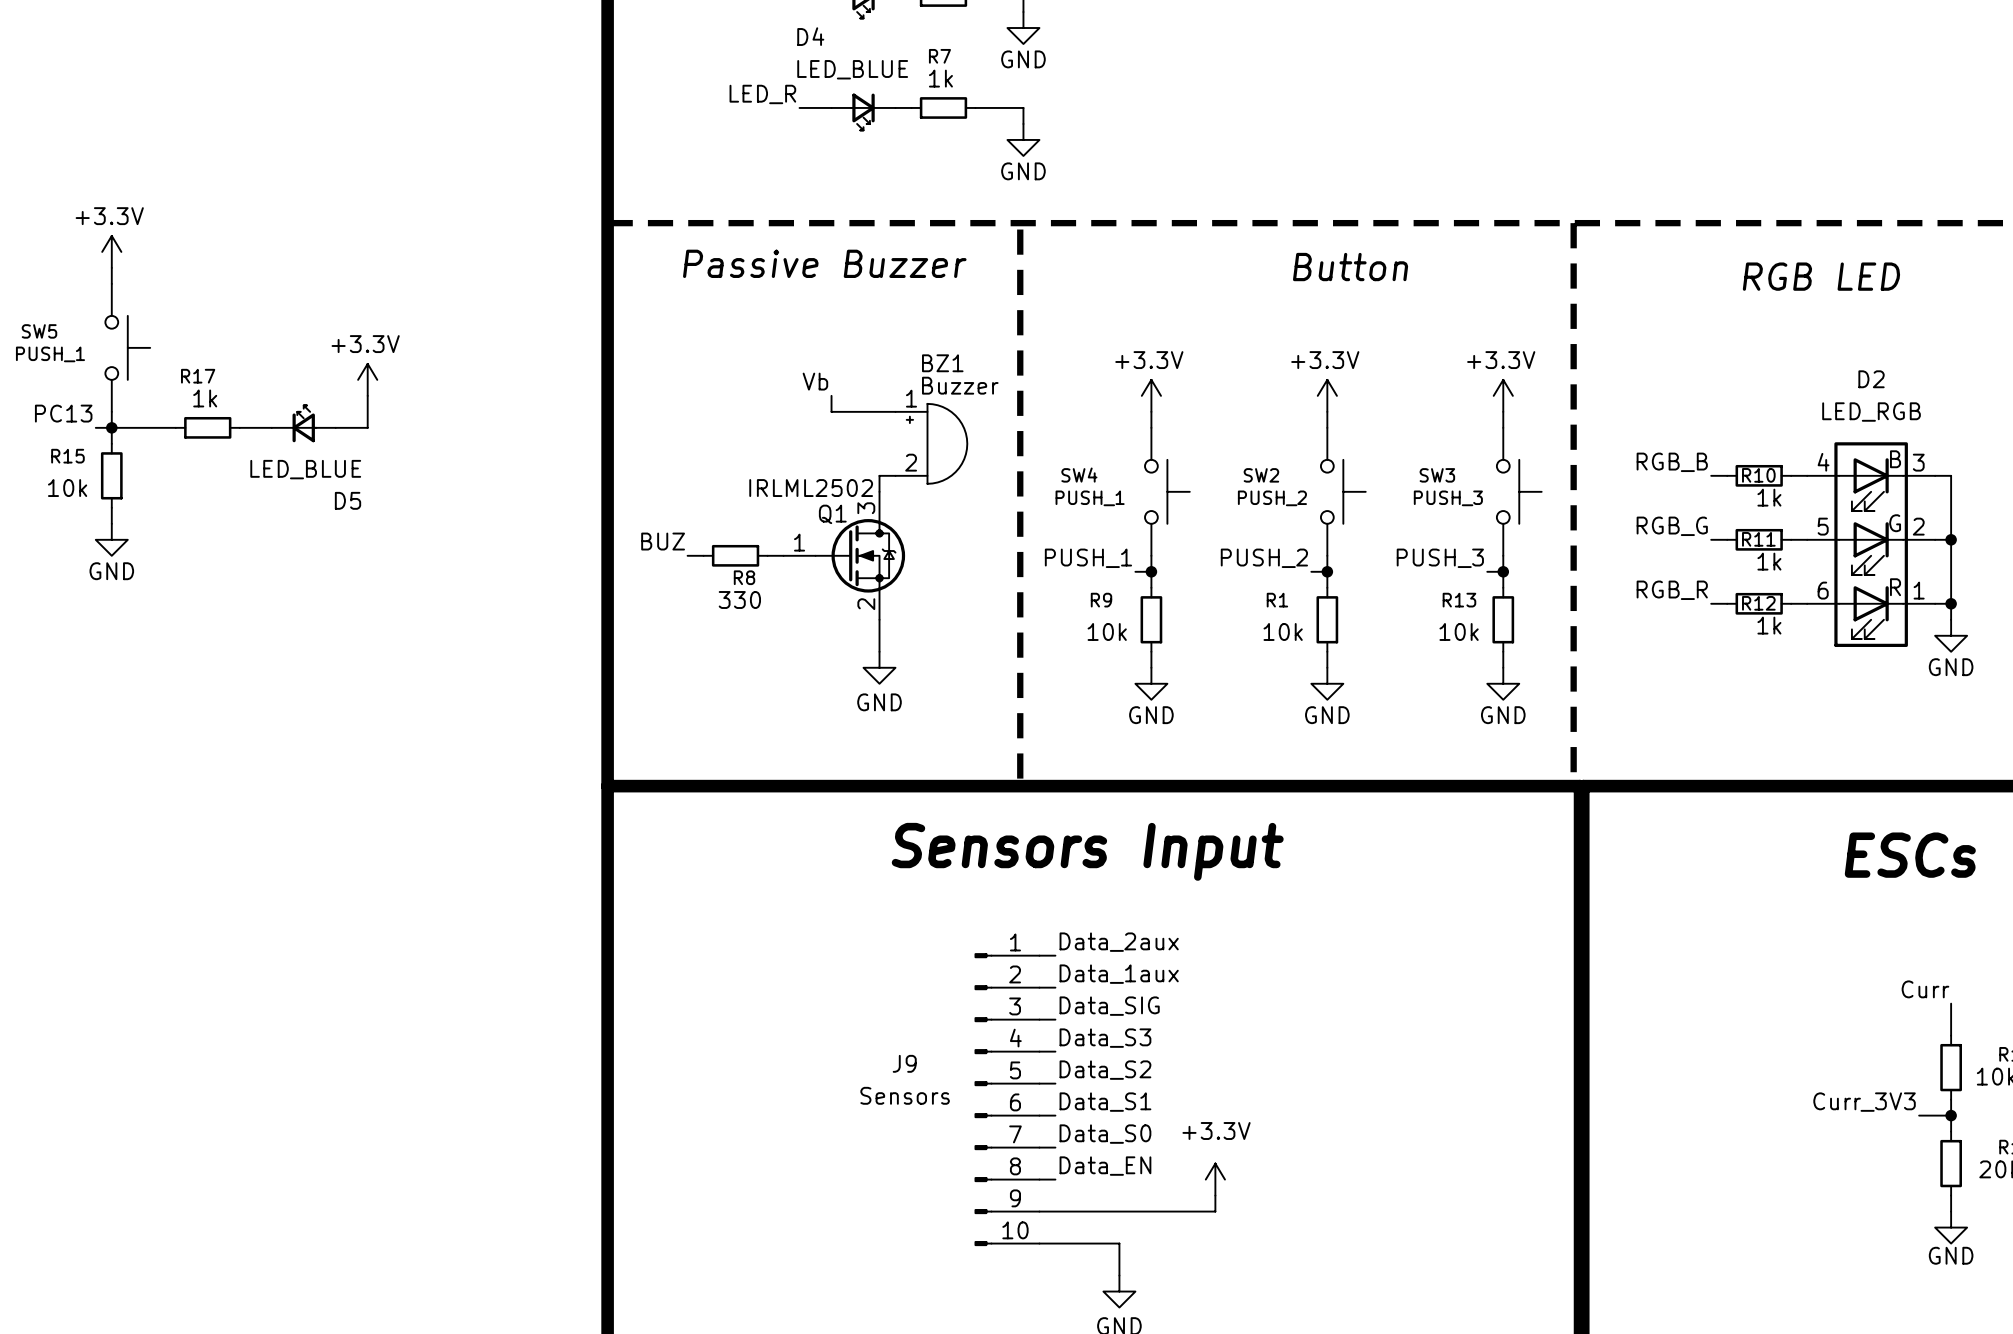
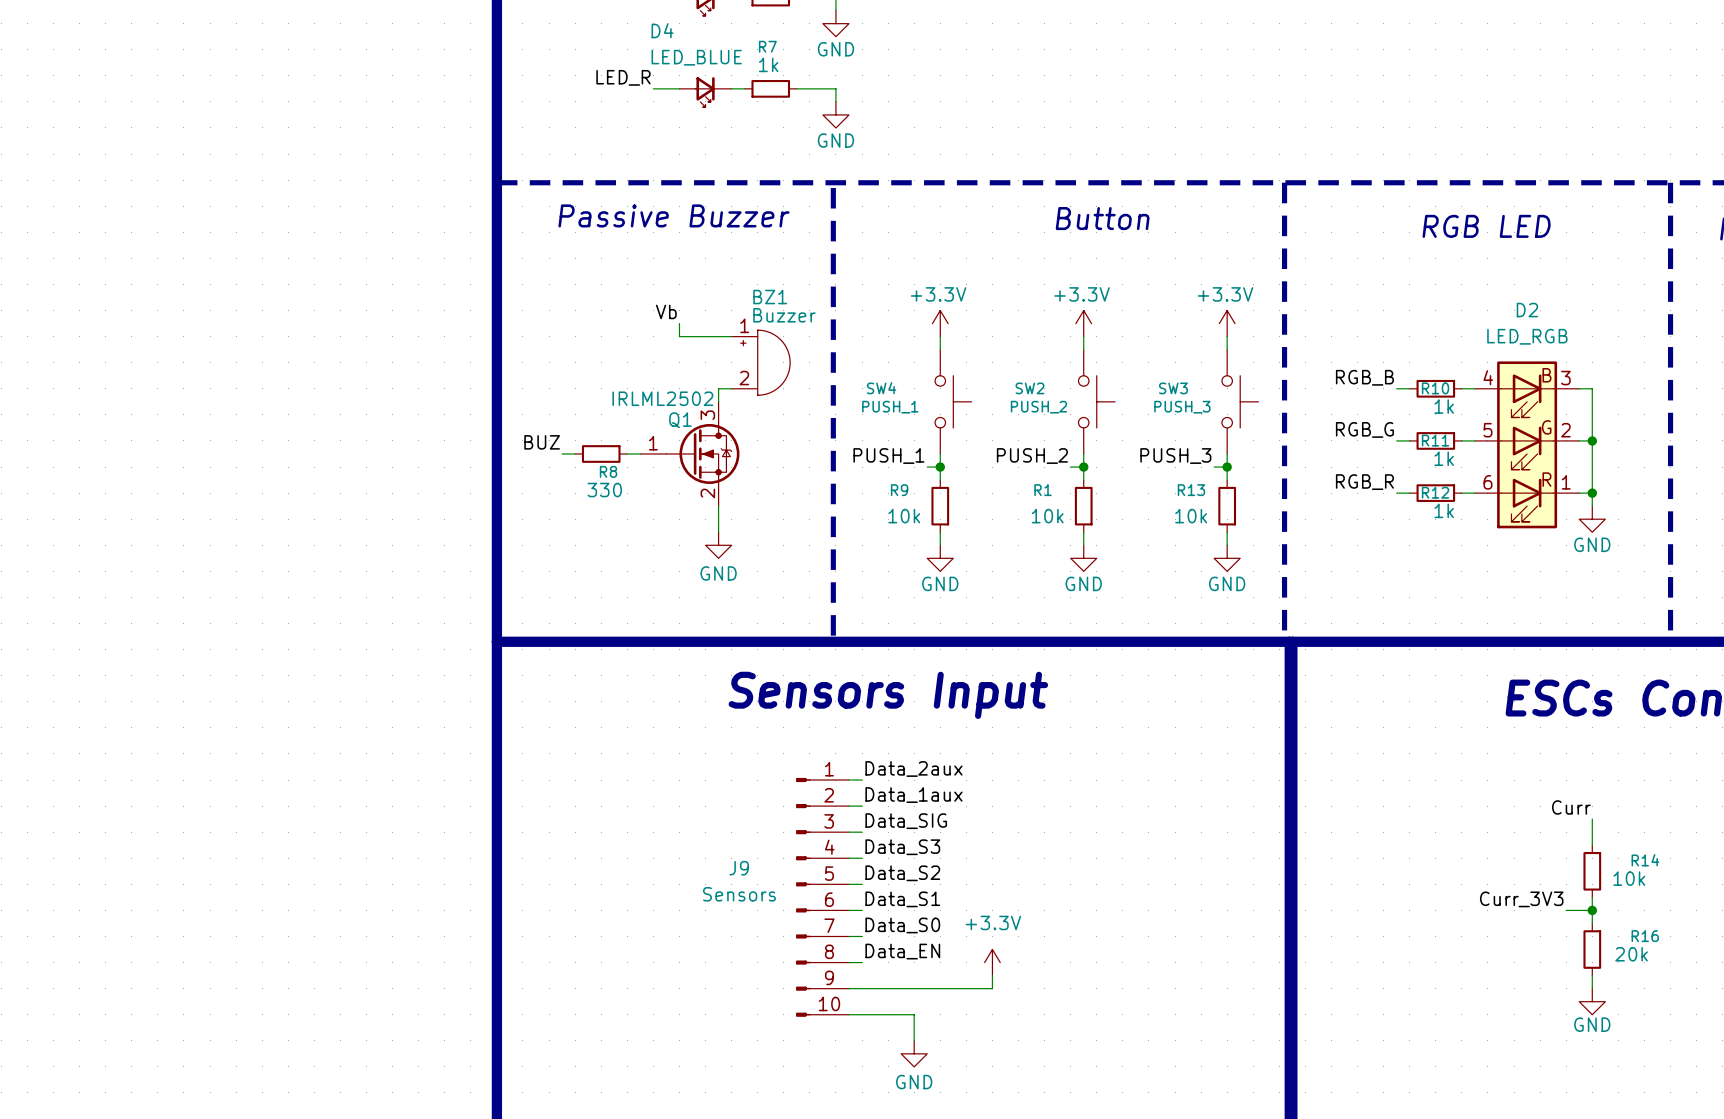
power symbol: +3.3V (111, 251) -> none
wire: (111, 267) (111, 283) -> none
SW5: PUSH_1 (127, 347) -> none
power symbol: +3.3V (367, 379) -> none
wire: (367, 395) (367, 427) (335, 427) -> none
wire: (111, 411) (111, 443) -> none
label: PC13 (63, 413) -> none
D5: LED_BLUE (303, 423) -> none
wire: (95, 427) (175, 427) -> none
junction: (111, 427) -> none
R17: 1k (207, 427) -> none
wire: (239, 427) (271, 427) -> none
R15: 10k (111, 475) -> none
wire: (111, 507) (111, 523) -> none
power symbol: GND (111, 539) -> none

